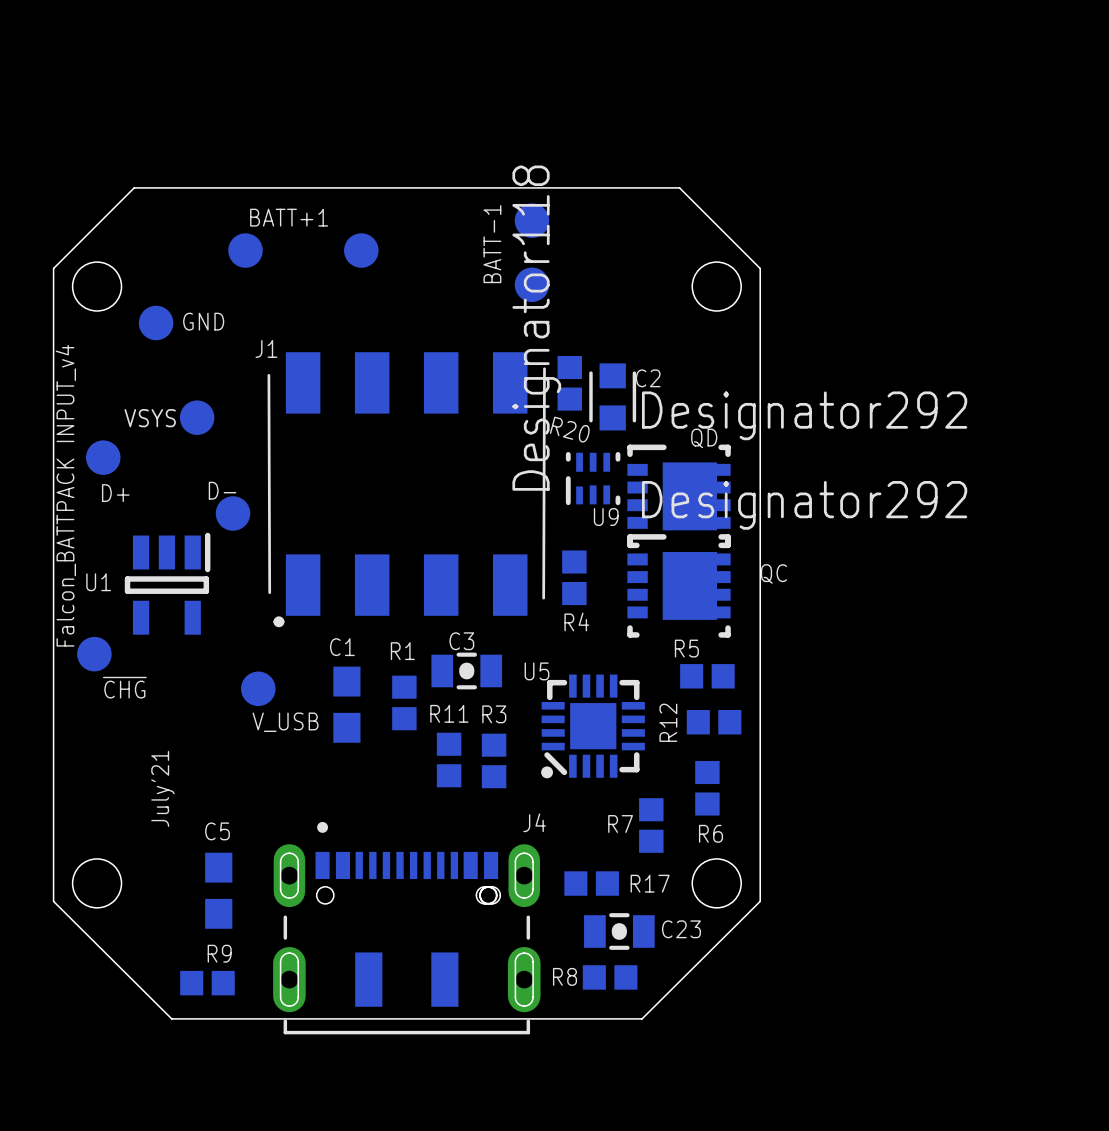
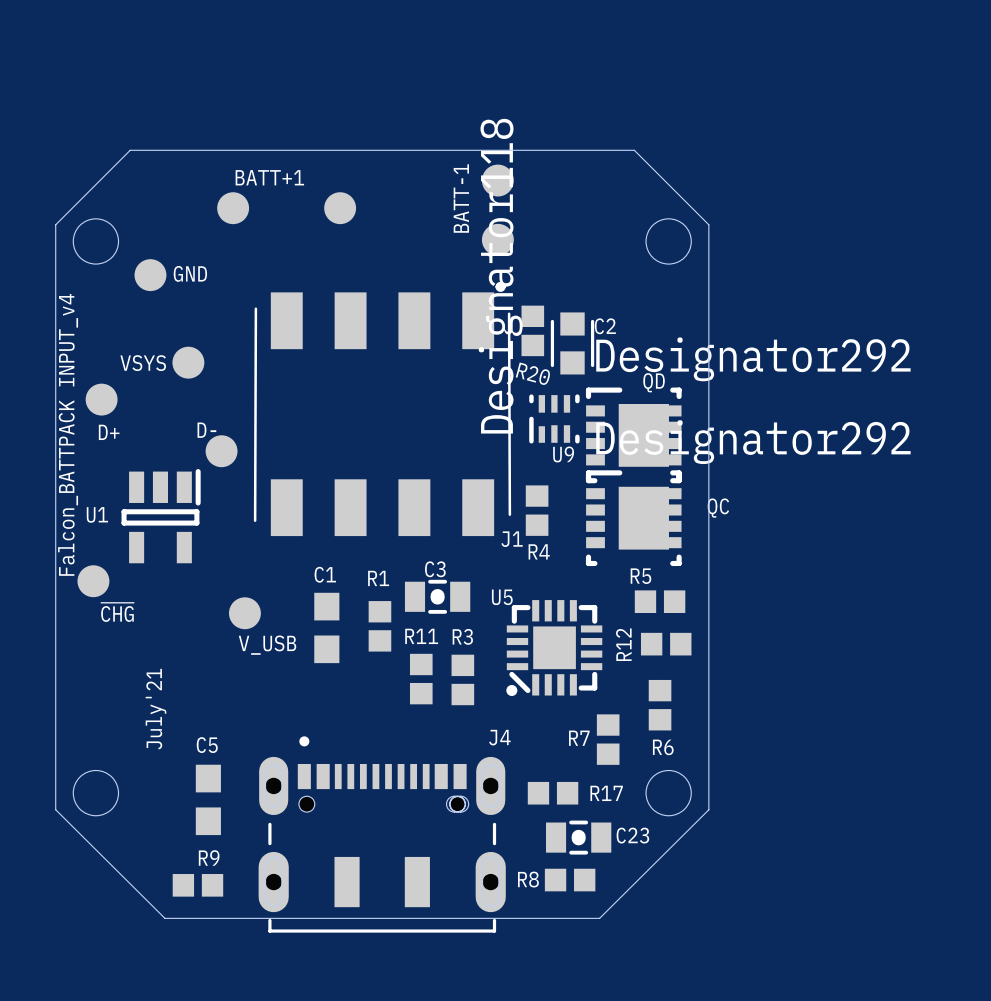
J1 rotation: 0° (406, 489) -> 180° (382, 408)

